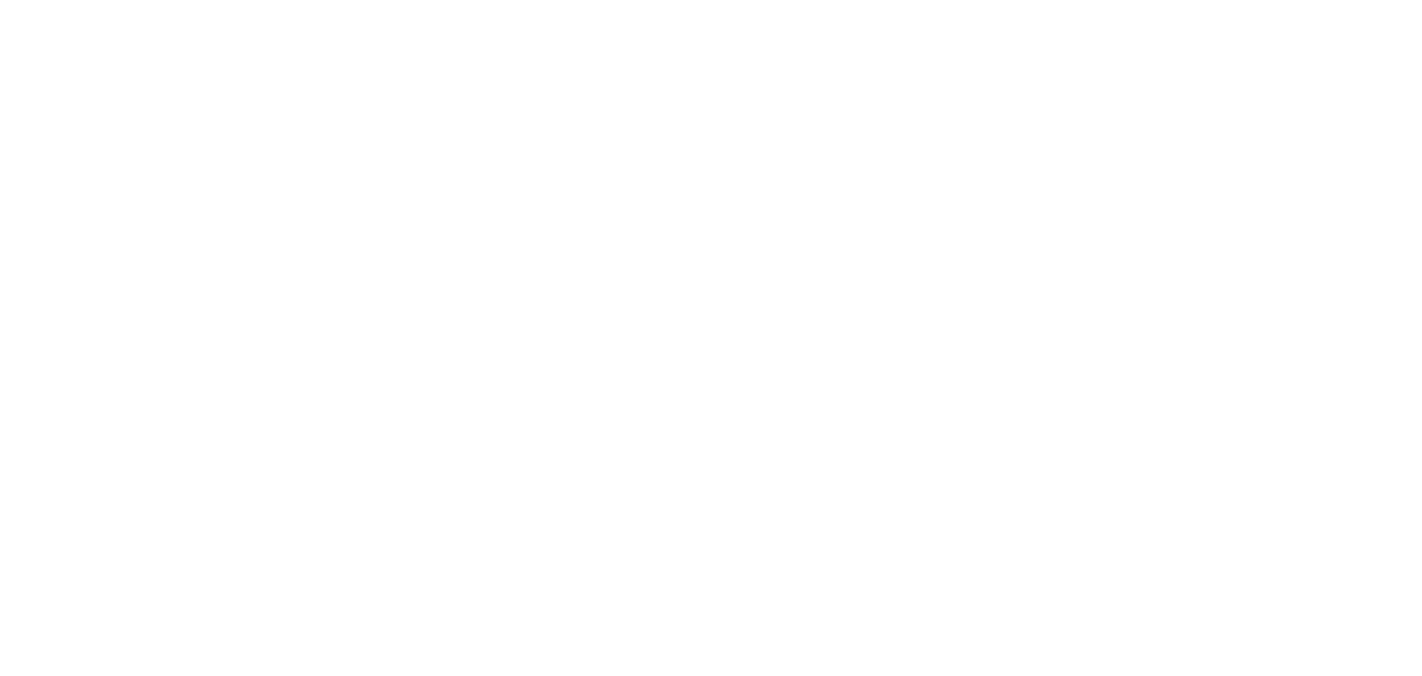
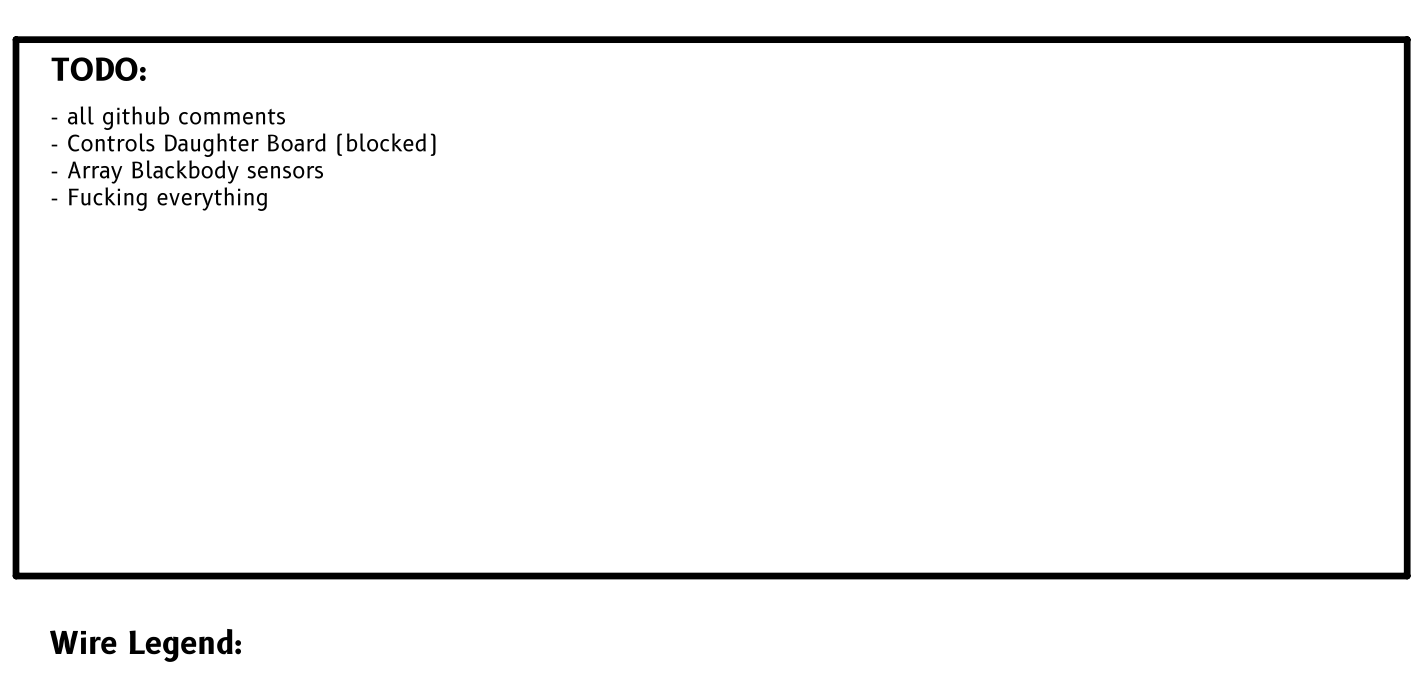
line: none -> (15, 39) (1407, 39) (1407, 576) (15, 576) (15, 39)
text: none -> TODO: (98, 69)
text: none -> - all github comments (168, 118)
text: none -> - Controls Daughter Board (blocked) (243, 145)
text: none -> - Array Blackbody sensors (187, 172)
text: none -> - Fucking everything (159, 199)
text: none -> Wire Legend: (145, 645)

